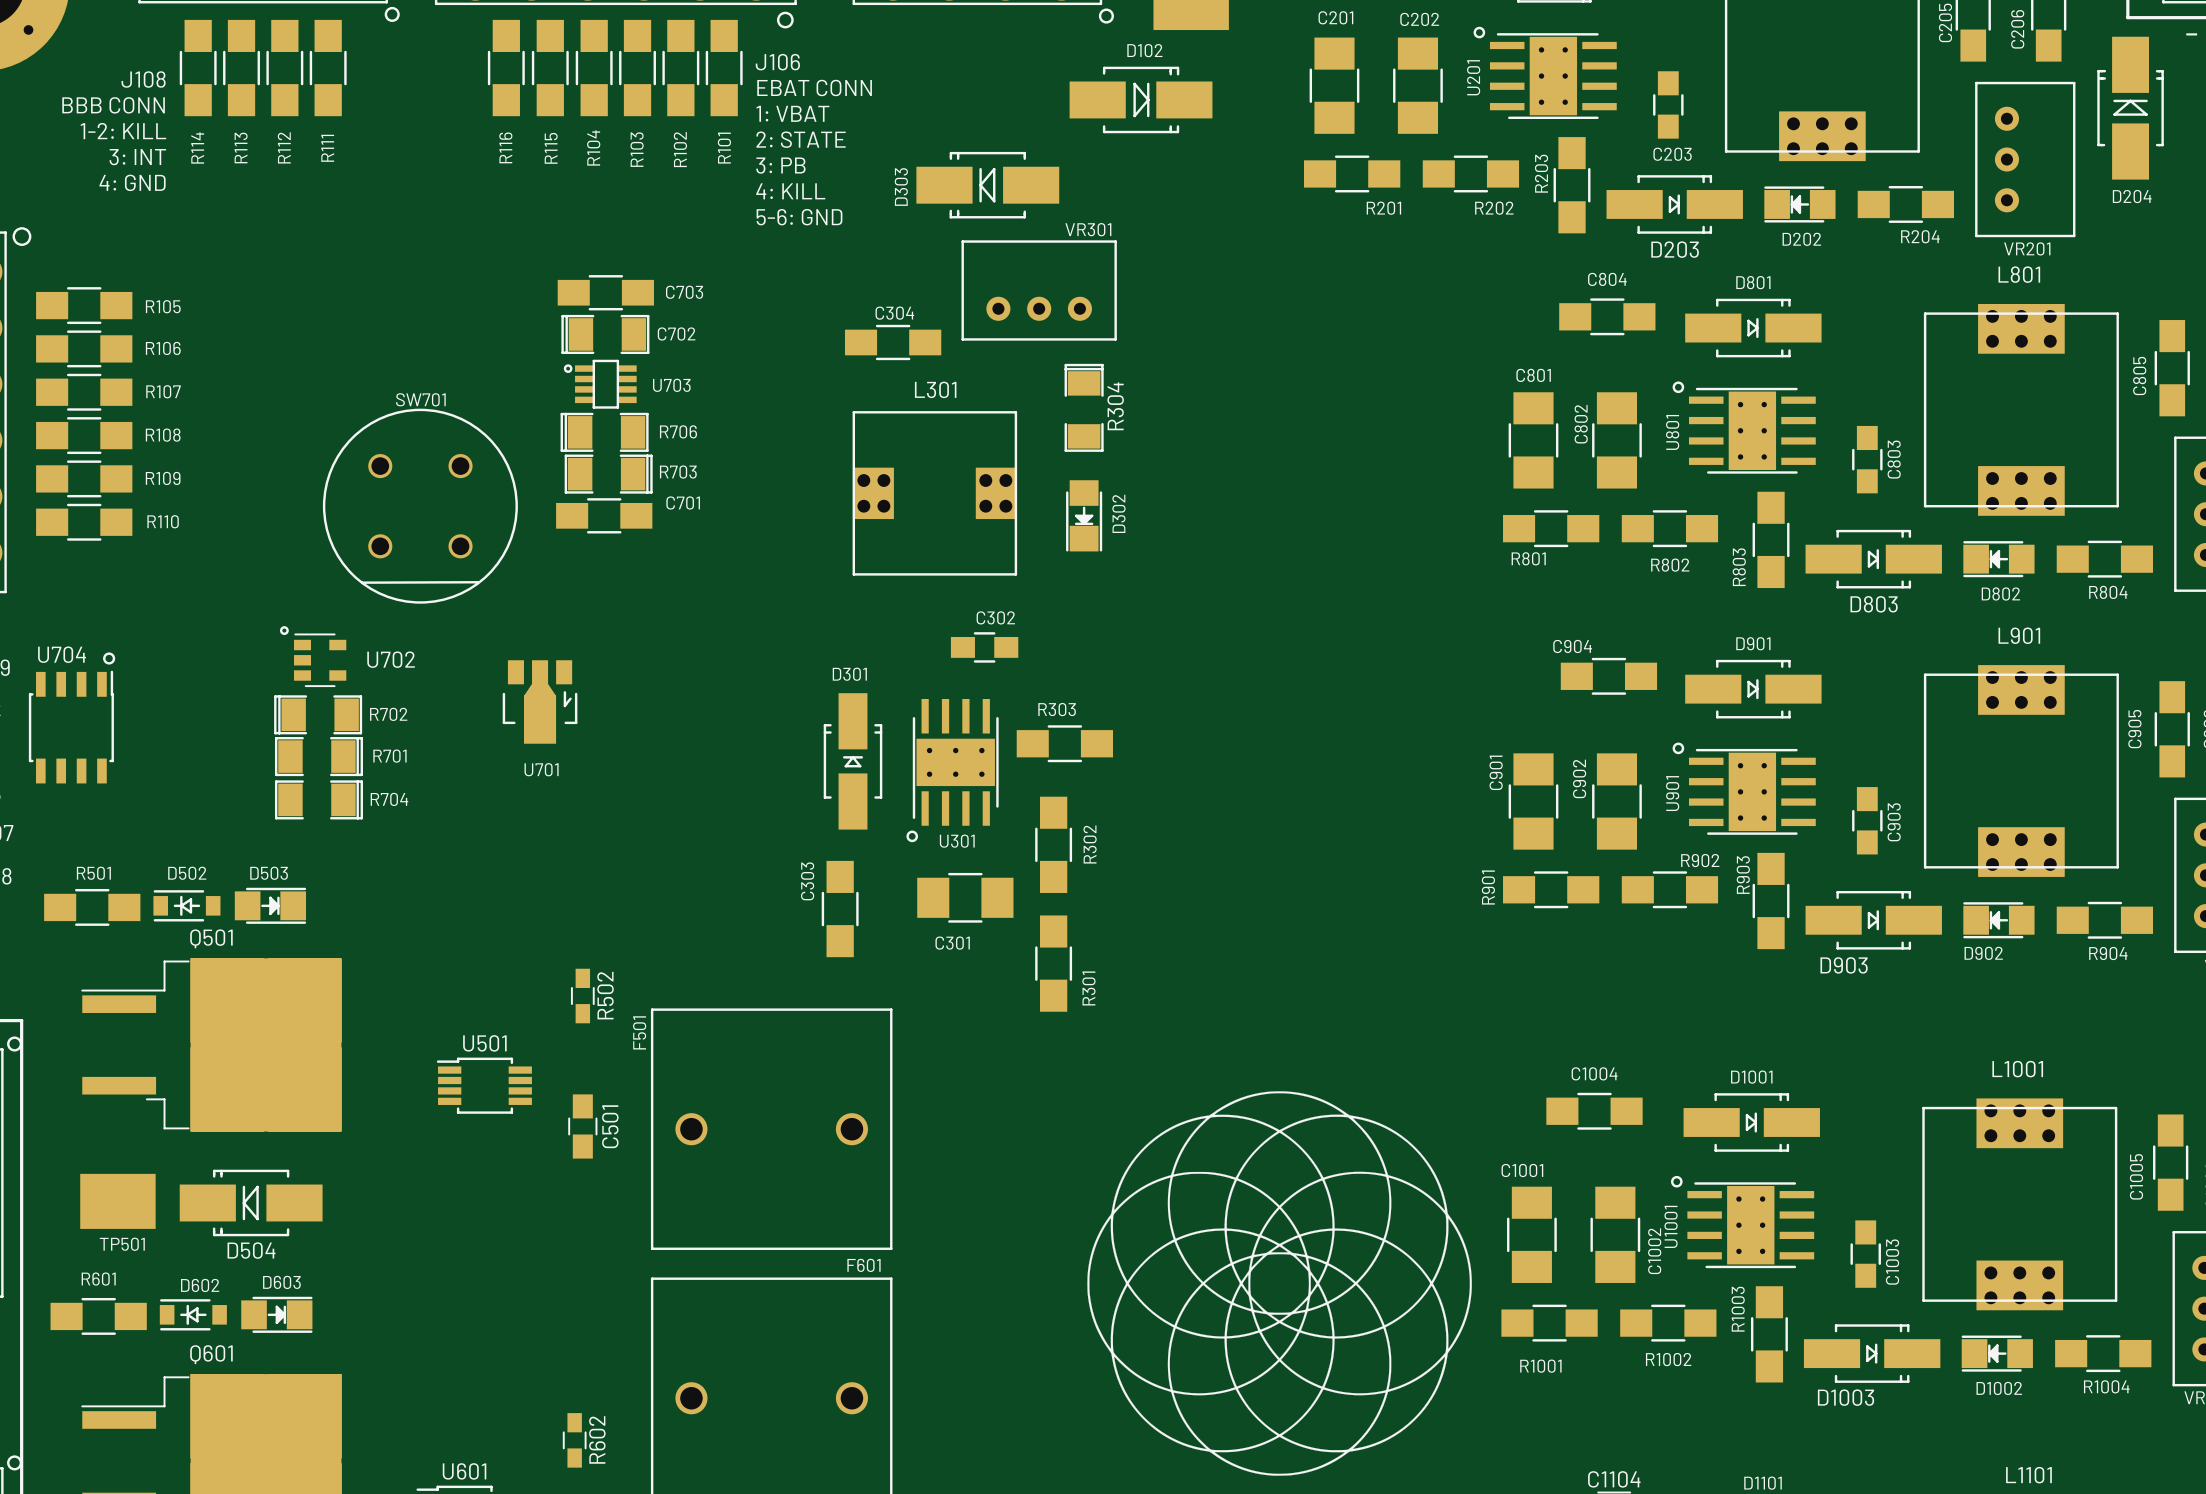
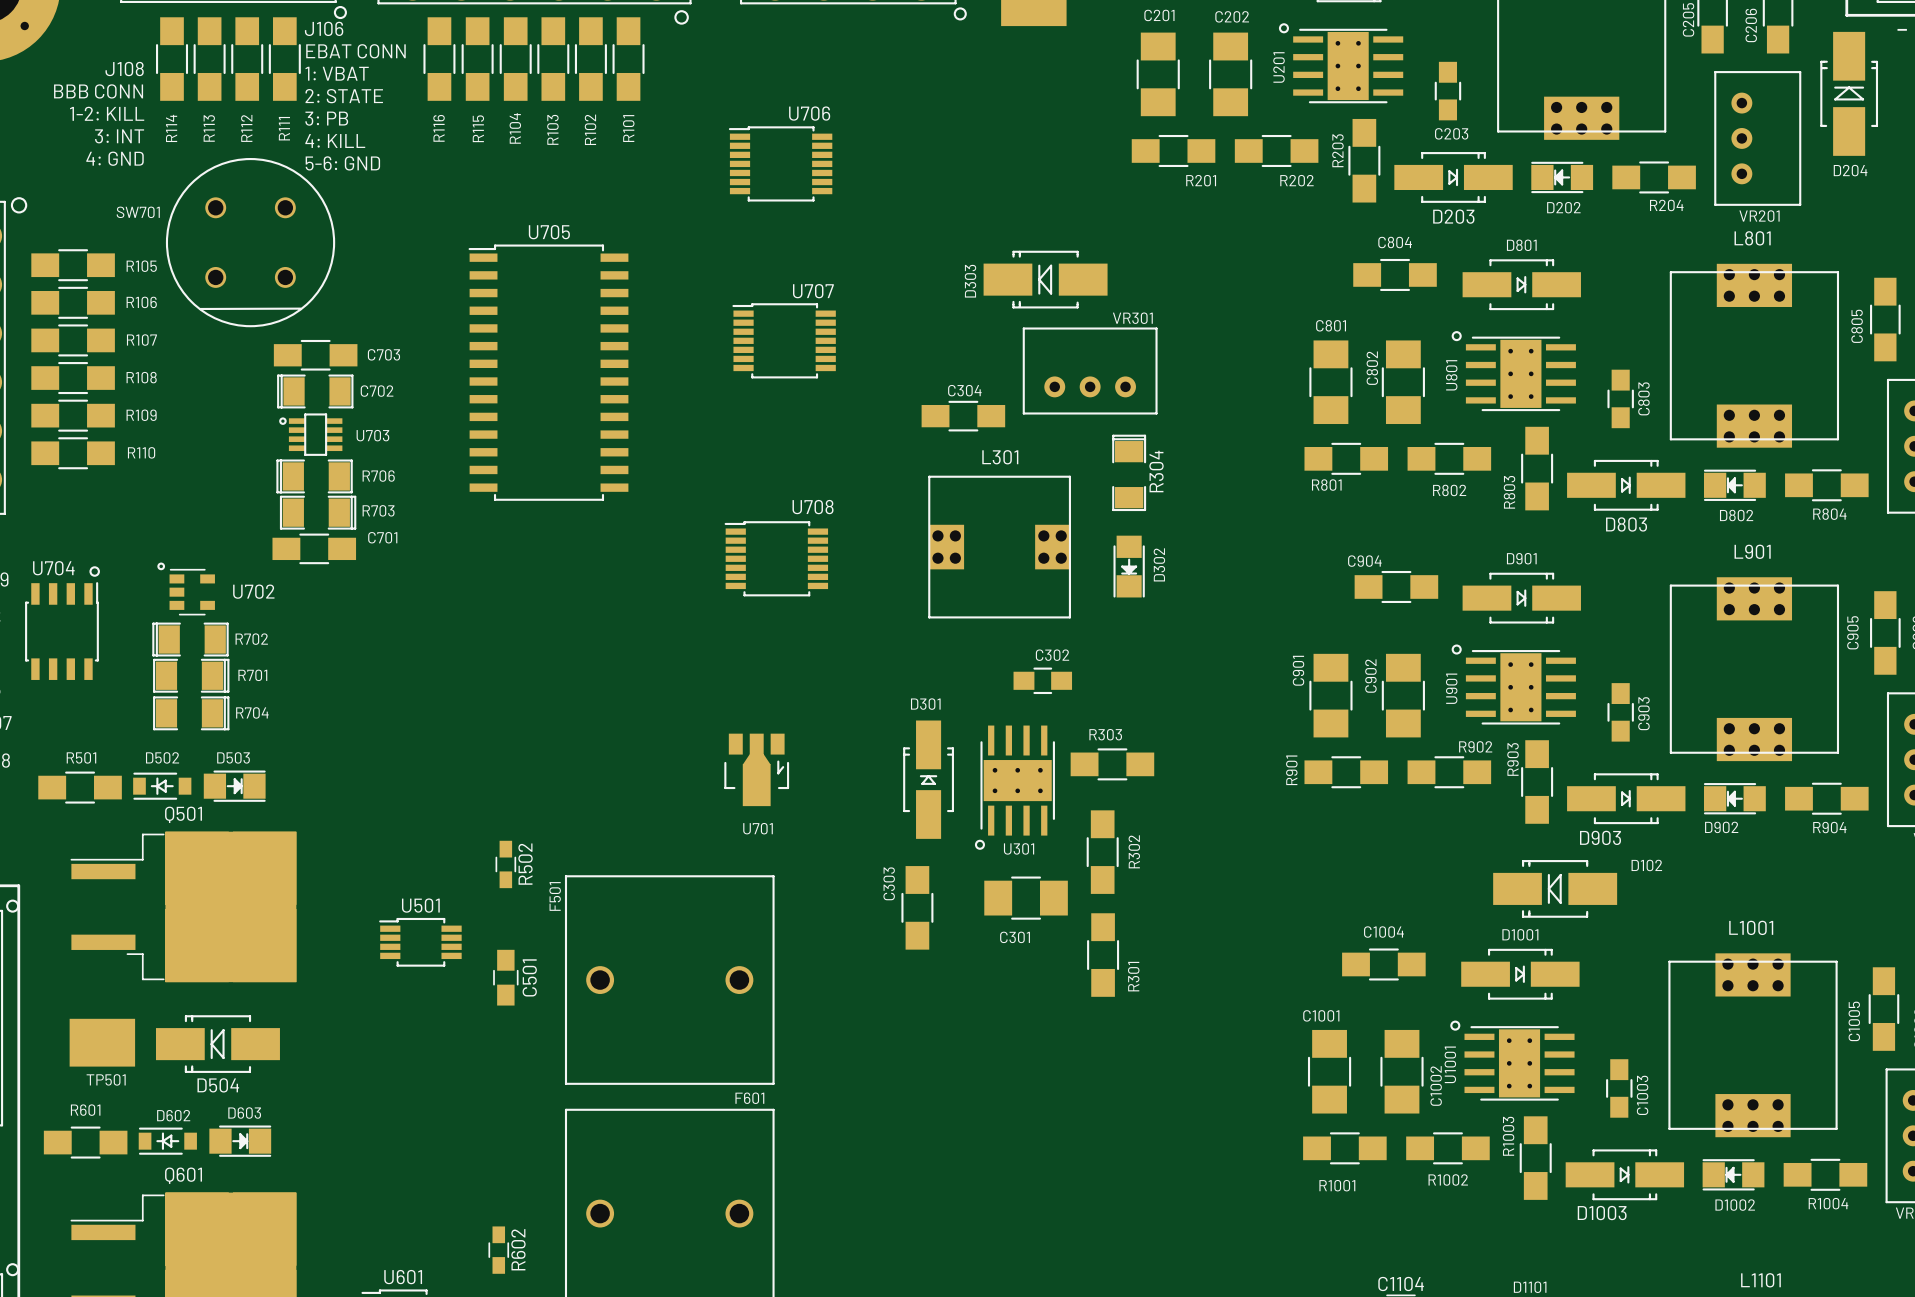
text: none -> J106 (324, 28)
D102 name position: D102 (1144, 50) -> D102 (1646, 865)
text: none -> EBAT CONN (355, 51)
text: J106 (777, 62) -> none
text: none -> 1: VBAT (337, 73)
text: EBAT CONN (814, 88) -> none
D102 rotation: 0° (1141, 99) -> 180° (1555, 888)
D102 position: (1141, 99) -> (1555, 888)
text: none -> 2: STATE (344, 96)
text: 1: VBAT (792, 113) -> none
text: none -> 3: PB (326, 118)
text: 2: STATE (801, 139) -> none
D303 footprint: [916, 151, 1060, 219] -> [983, 250, 1108, 309]
text: none -> 4: KILL (335, 141)
text: 3: PB (780, 165) -> none
text: none -> 5-6: GND (342, 163)
U706: none -> (780, 163)
text: 4: KILL (790, 191) -> none
text: 5-6: GND (799, 217) -> none
VR301 position: (1039, 290) -> (1090, 371)
C703 position: (605, 292) -> (315, 355)
C702 position: (605, 334) -> (315, 391)
C304 position: (893, 342) -> (963, 416)
U703 position: (600, 384) -> (310, 434)
U707: none -> (784, 340)
SW701 name position: SW701 (420, 399) -> SW701 (138, 212)
R304 position: (1084, 407) -> (1129, 472)
U705: none -> (548, 372)
R706 position: (604, 432) -> (314, 476)
R703 position: (608, 474) -> (318, 512)
L301 position: (934, 493) -> (999, 547)
SW701 position: (420, 506) -> (250, 242)
C701 position: (604, 515) -> (314, 548)
D302 position: (1084, 515) -> (1129, 566)
U708: none -> (776, 558)
C302 position: (984, 647) -> (1042, 680)
U702 position: (313, 656) -> (186, 588)
U701 position: (540, 701) -> (756, 769)
R702 position: (318, 714) -> (190, 639)
R303 position: (1064, 743) -> (1112, 764)
R701 position: (318, 756) -> (191, 675)
D301 position: (853, 761) -> (928, 779)
U301 position: (952, 770) -> (1014, 787)
R704 position: (318, 799) -> (191, 713)
R302 position: (1053, 844) -> (1102, 852)
C301 position: (965, 897) -> (1026, 898)
C303 position: (840, 909) -> (917, 907)
R301 position: (1053, 963) -> (1103, 955)
drawing: [1087, 1091, 1472, 1476] -> none

